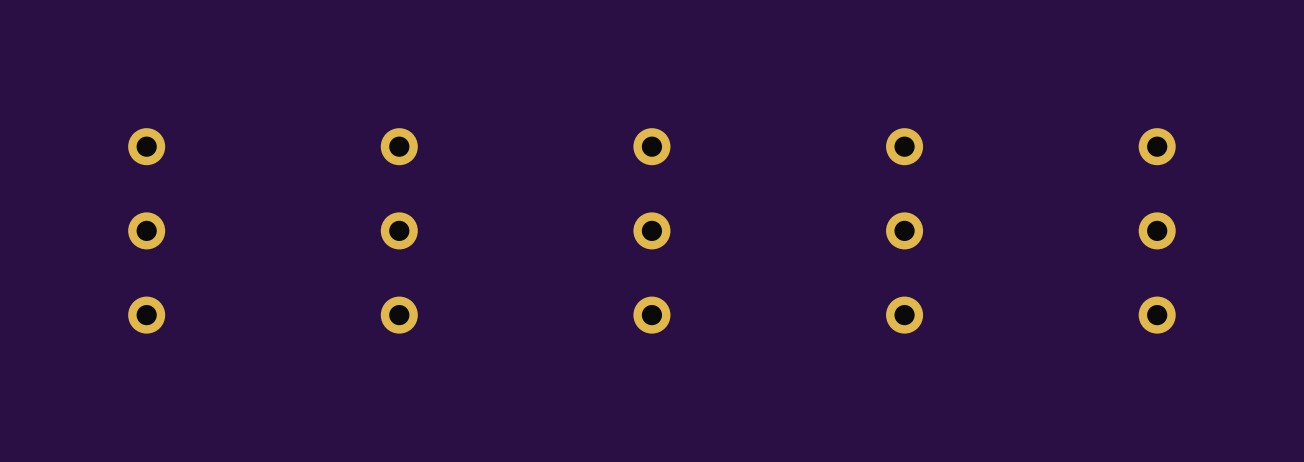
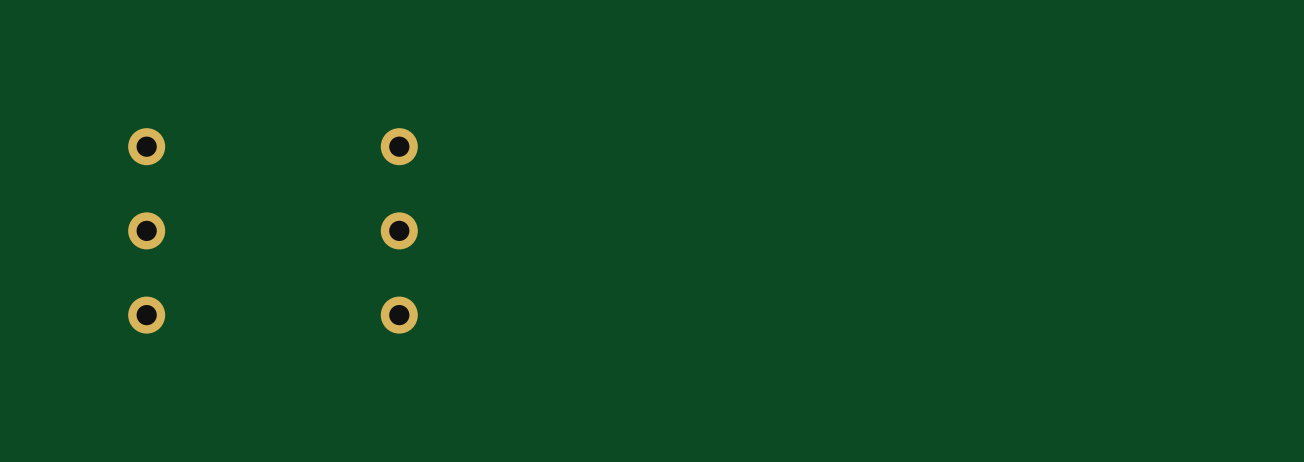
part: (651, 230) -> none
part: (904, 230) -> none
part: (1157, 230) -> none

